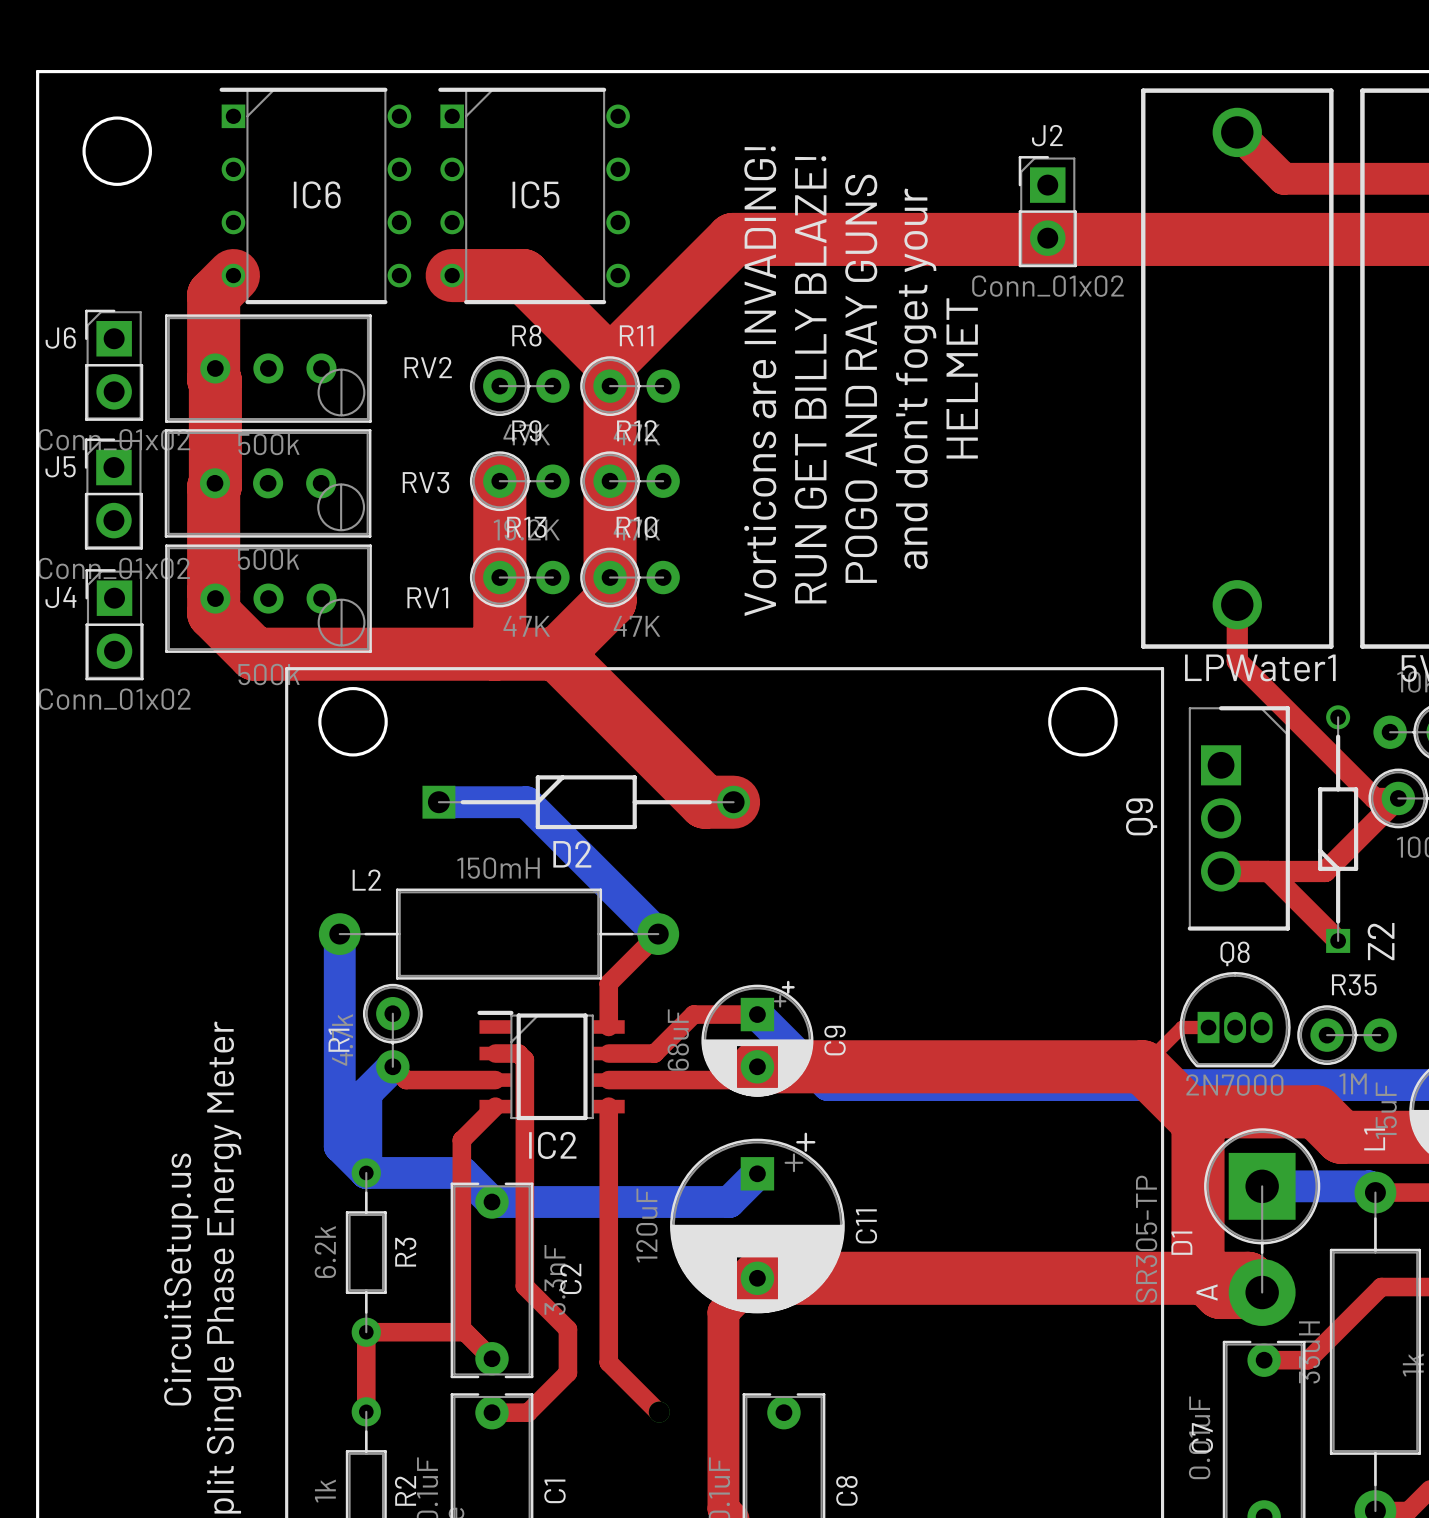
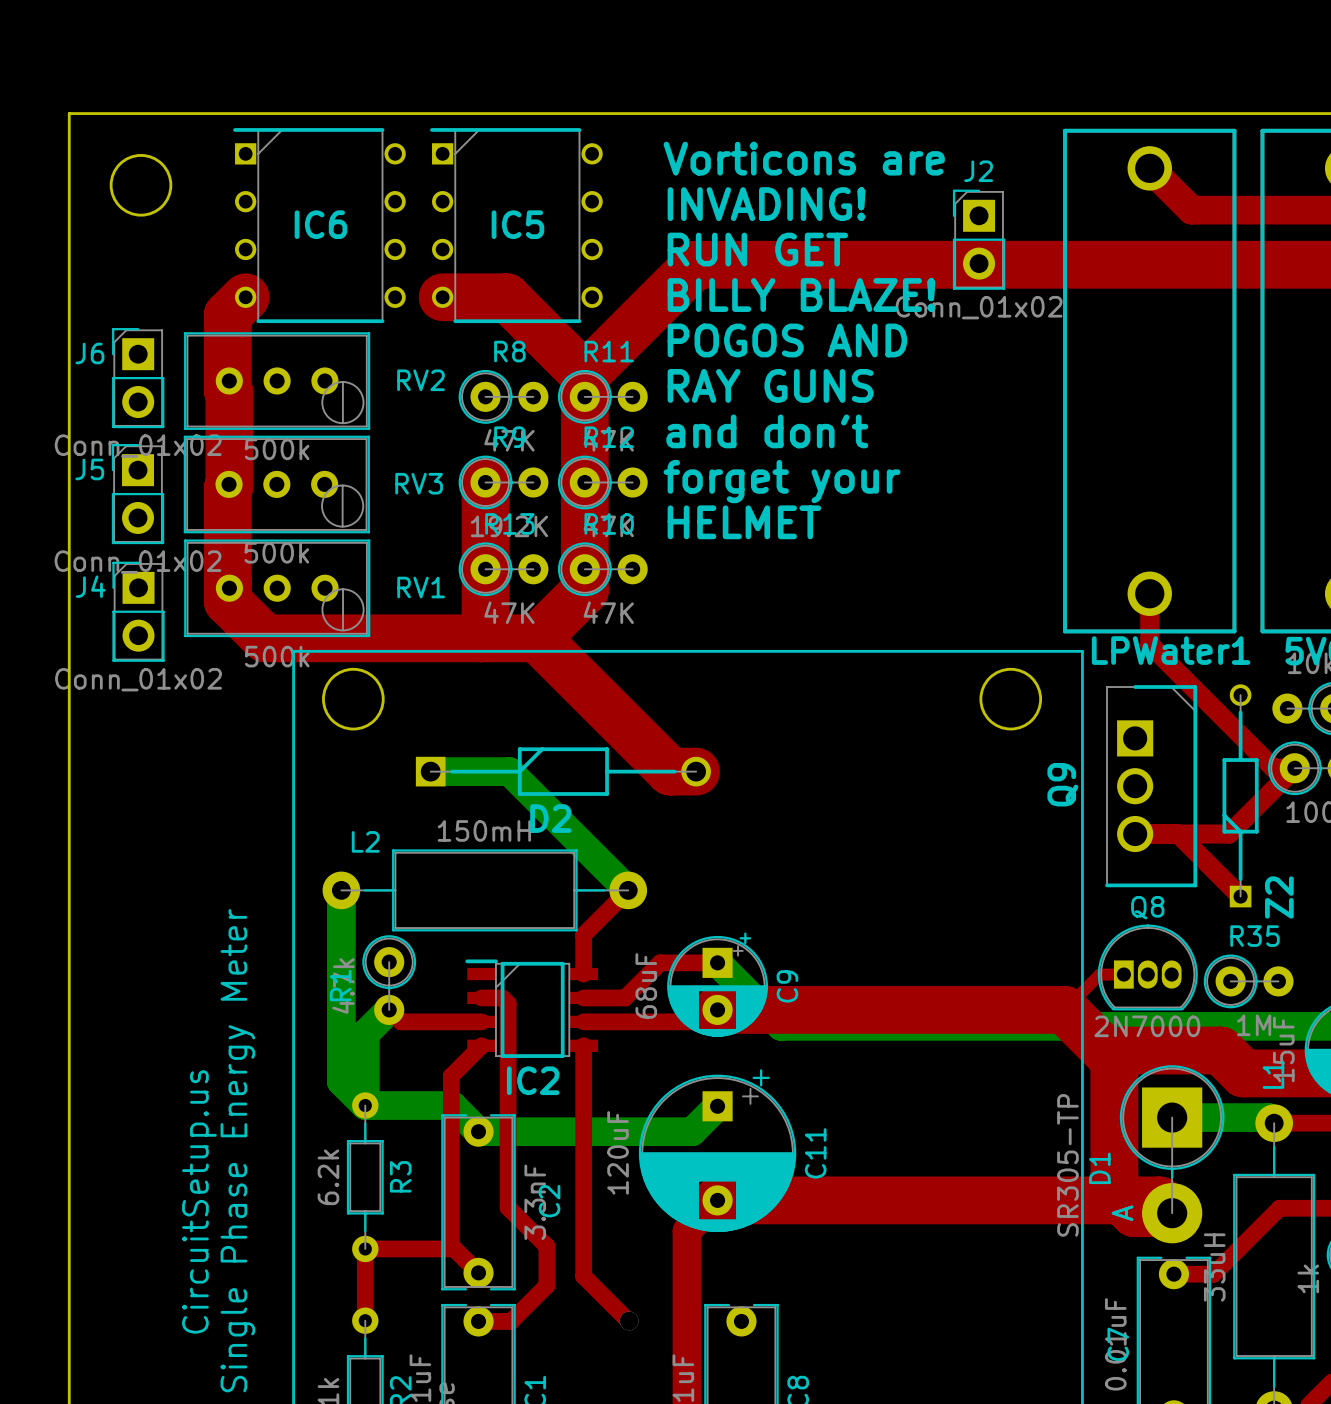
text: none -> INVADING! (766, 204)
text: none -> RUN GET (757, 249)
text: none -> POGOS AND (787, 340)
text: none -> RAY GUNS (770, 385)
text: POGO AND RAY GUNS (861, 378) -> none
text: and don't foget your (916, 378) -> none
text rotation: 0° (962, 378) -> 90° clockwise (744, 522)
text position: HELMET (962, 378) -> HELMET (744, 522)
text: RUN GET BILLY BLAZE! (810, 379) -> BILLY BLAZE! (801, 295)
text: Vorticons are INVADING! (760, 381) -> Vorticons are (804, 158)
text: none -> and don't (767, 431)
text: none -> forget your (782, 481)

